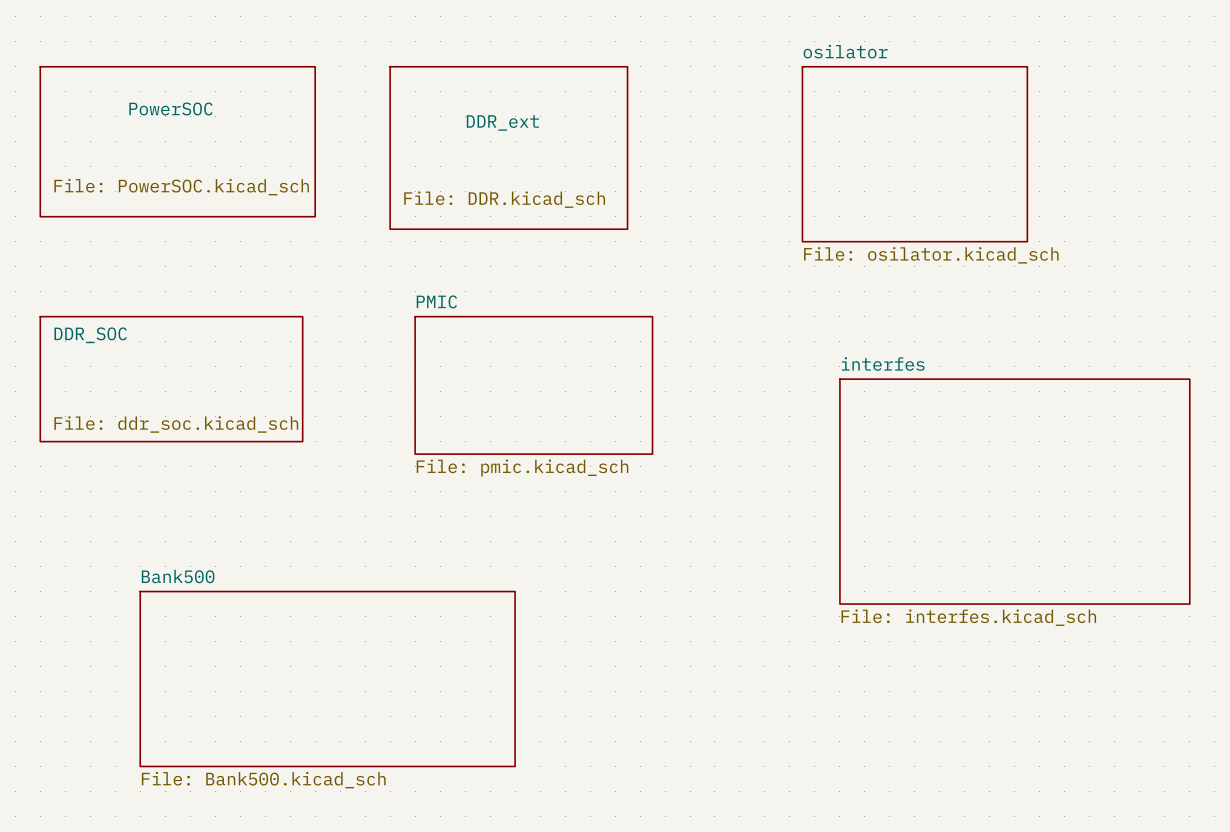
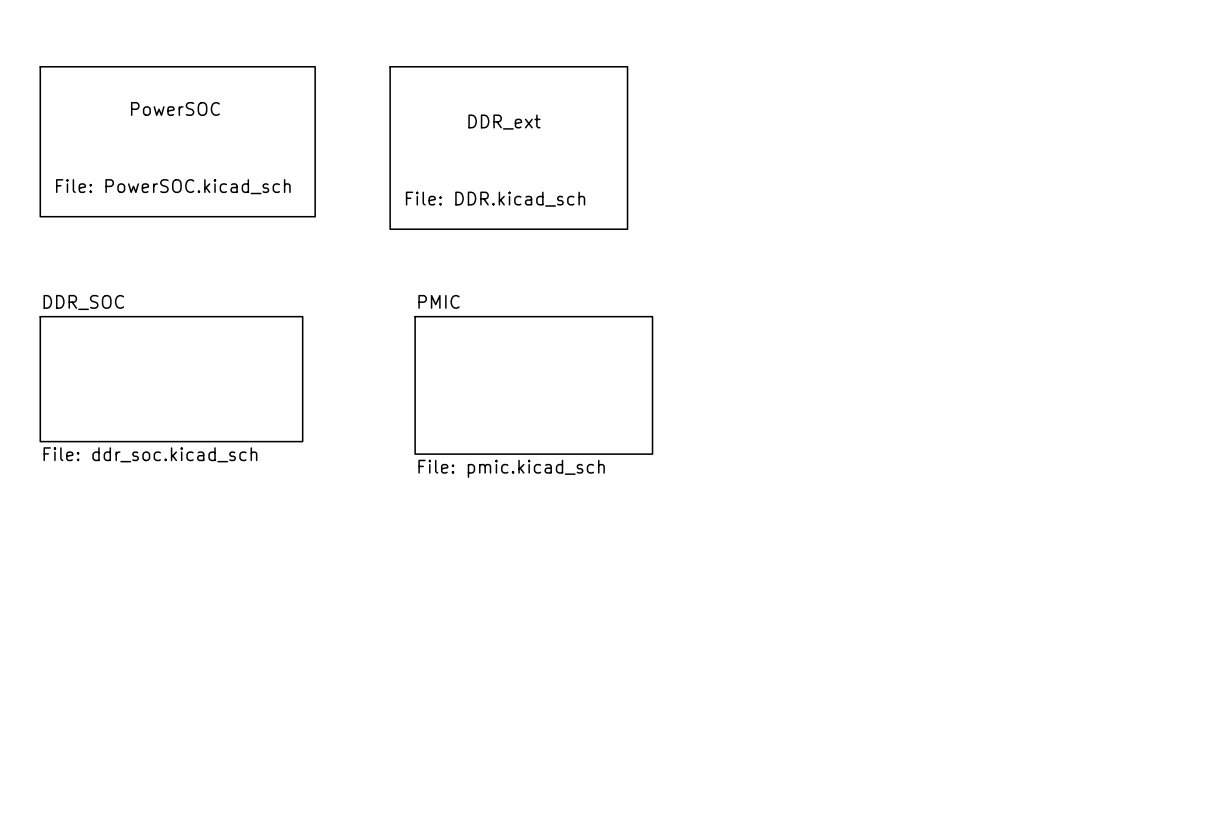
sheet osilator: File: osilator.kicad_sch (914, 154) -> none
sheet DDR_SOC name position: DDR_SOC (90, 335) -> DDR_SOC (83, 302)
sheet DDR_SOC value position: File: ddr_soc.kicad_sch (176, 424) -> File: ddr_soc.kicad_sch (150, 454)
sheet interfes: File: interfes.kicad_sch (1014, 491) -> none
sheet Bank500: File: Bank500.kicad_sch (327, 679) -> none

